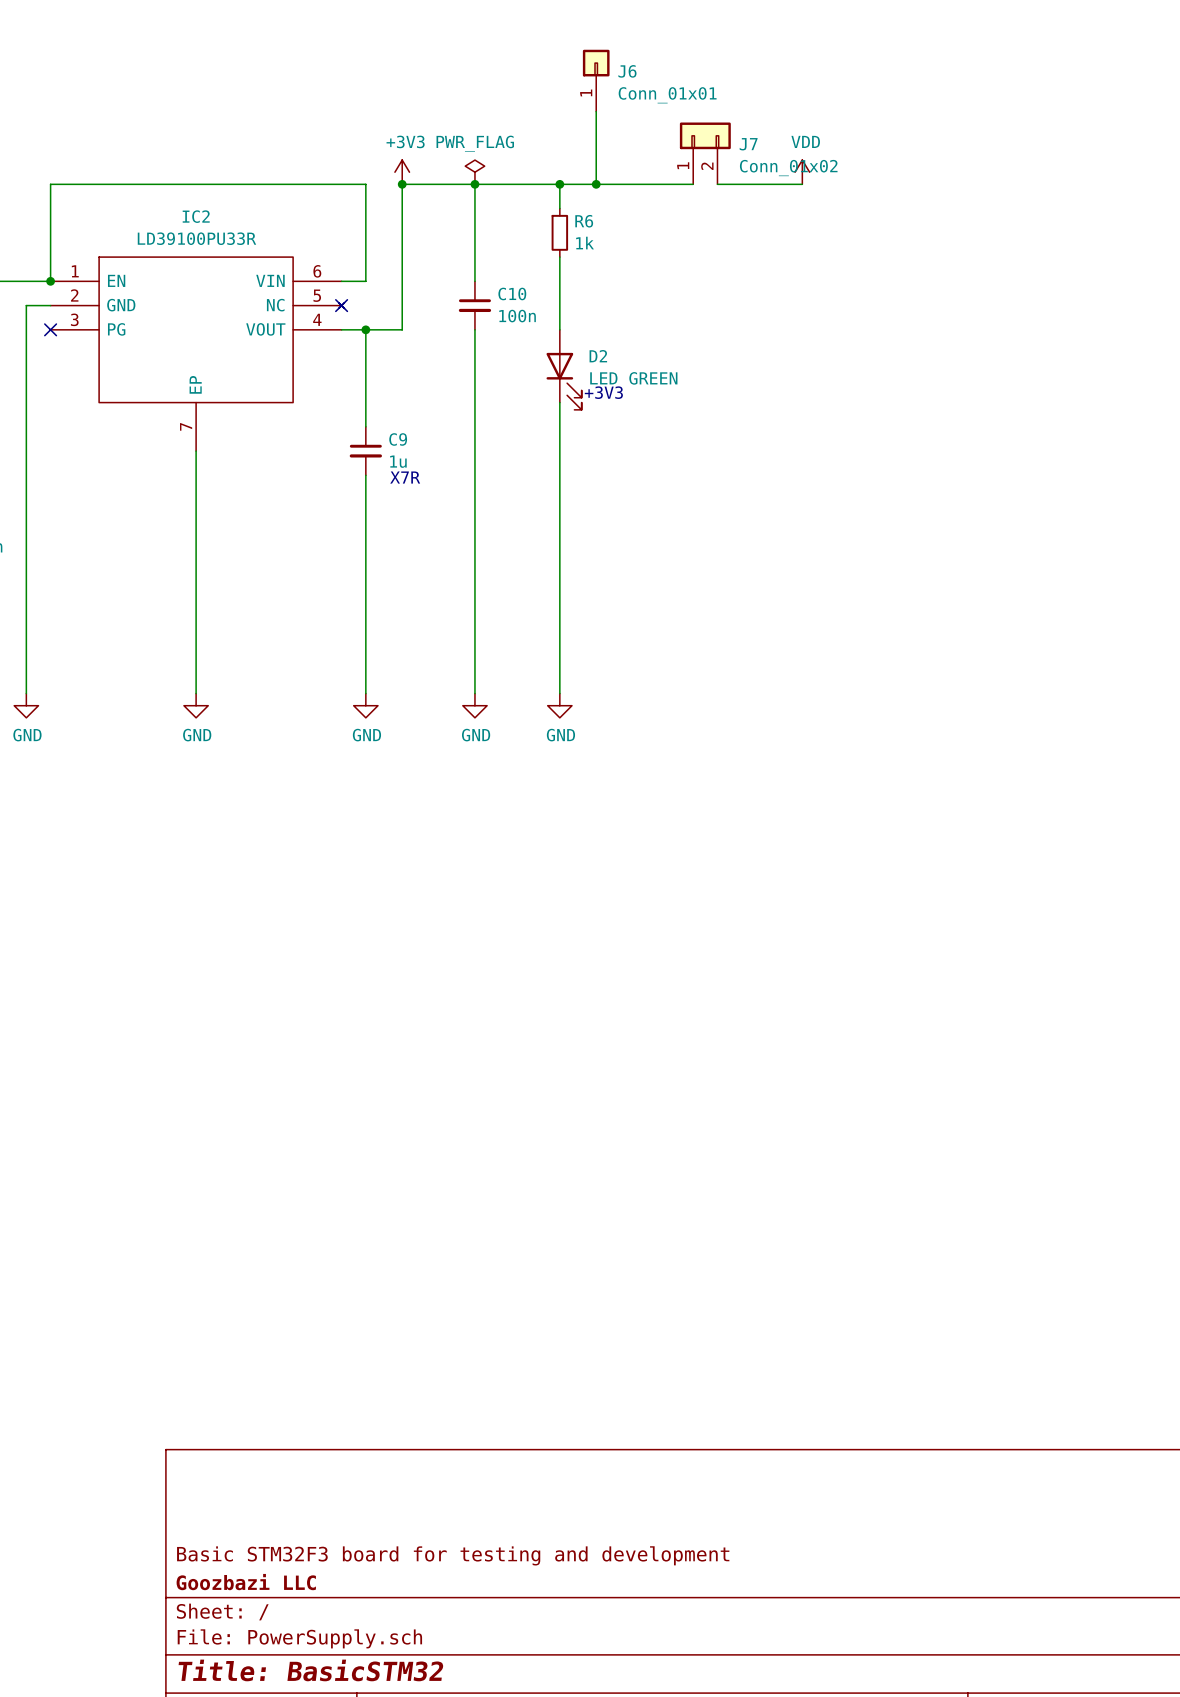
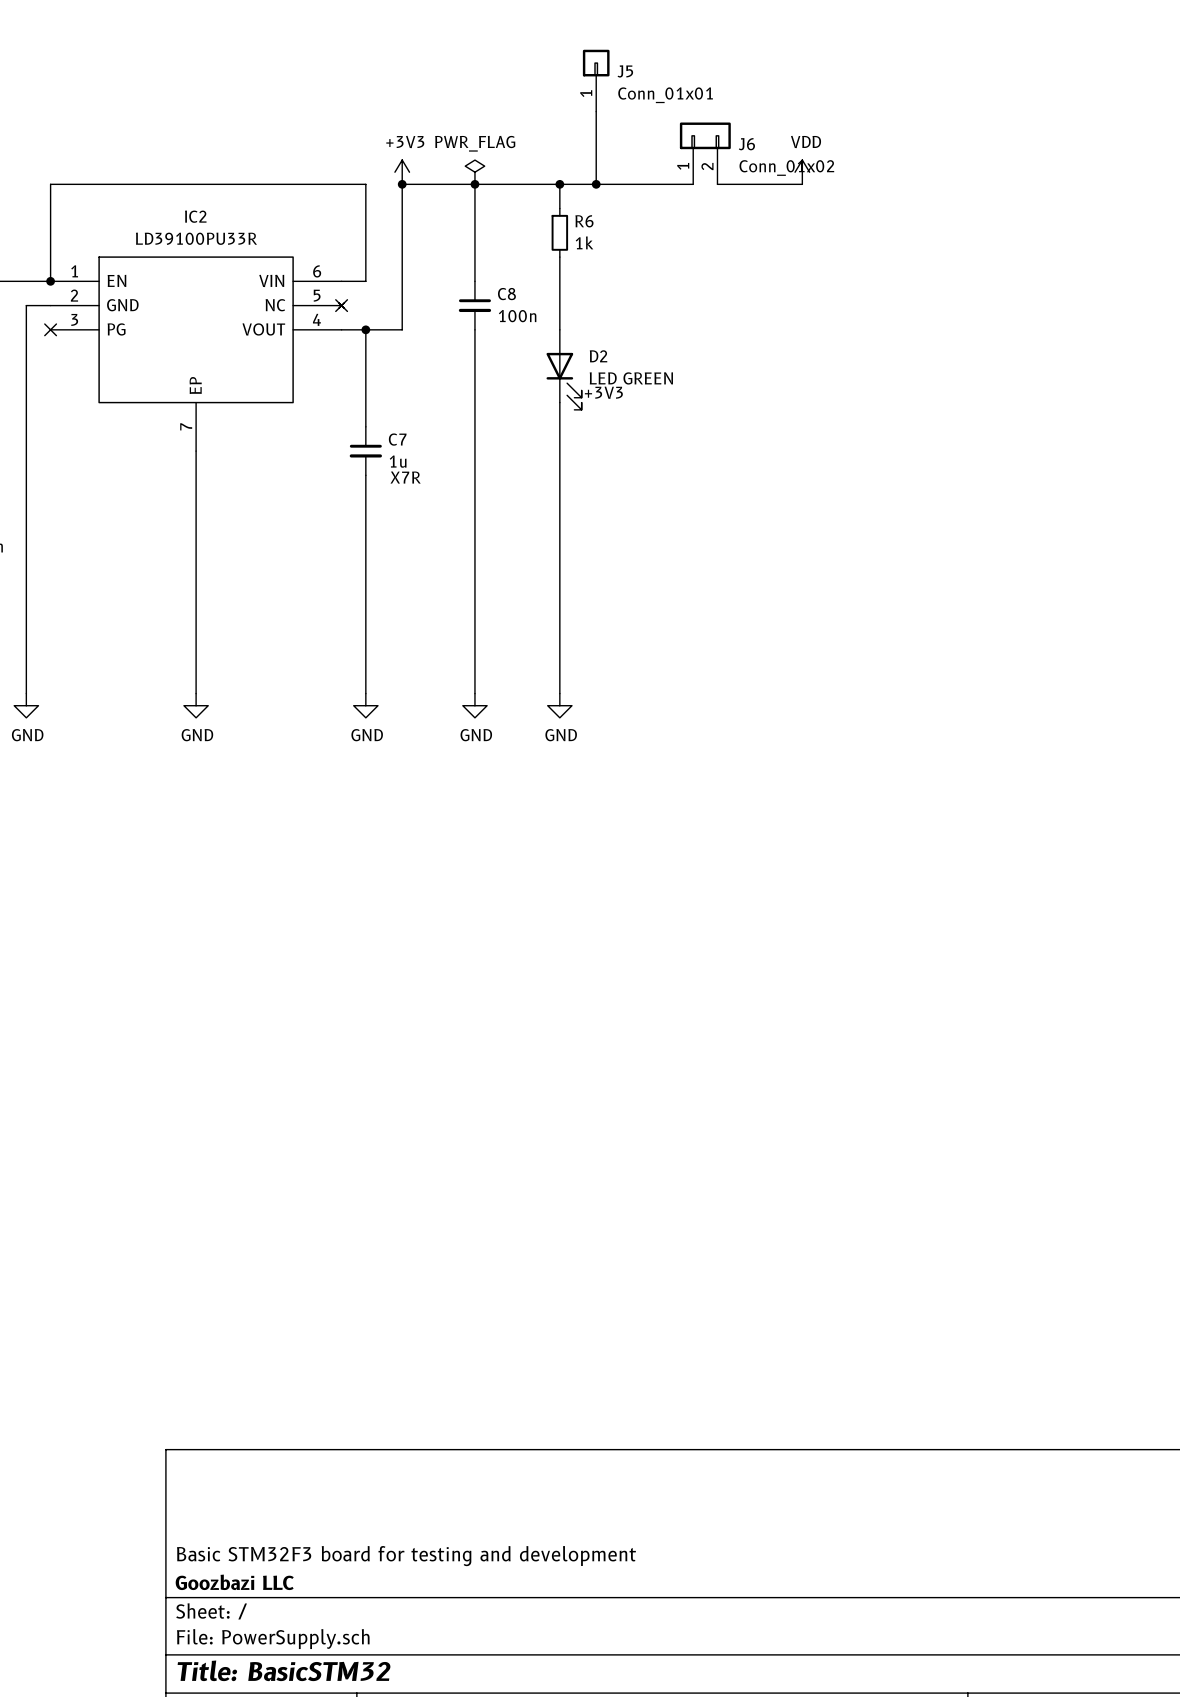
J6 name: J6 (627, 71) -> J5 (625, 71)
J7 name: J7 (748, 144) -> J6 (746, 144)
C10 name: C10 (512, 293) -> C8 (506, 294)
C9 name: C9 (398, 439) -> C7 (397, 439)

